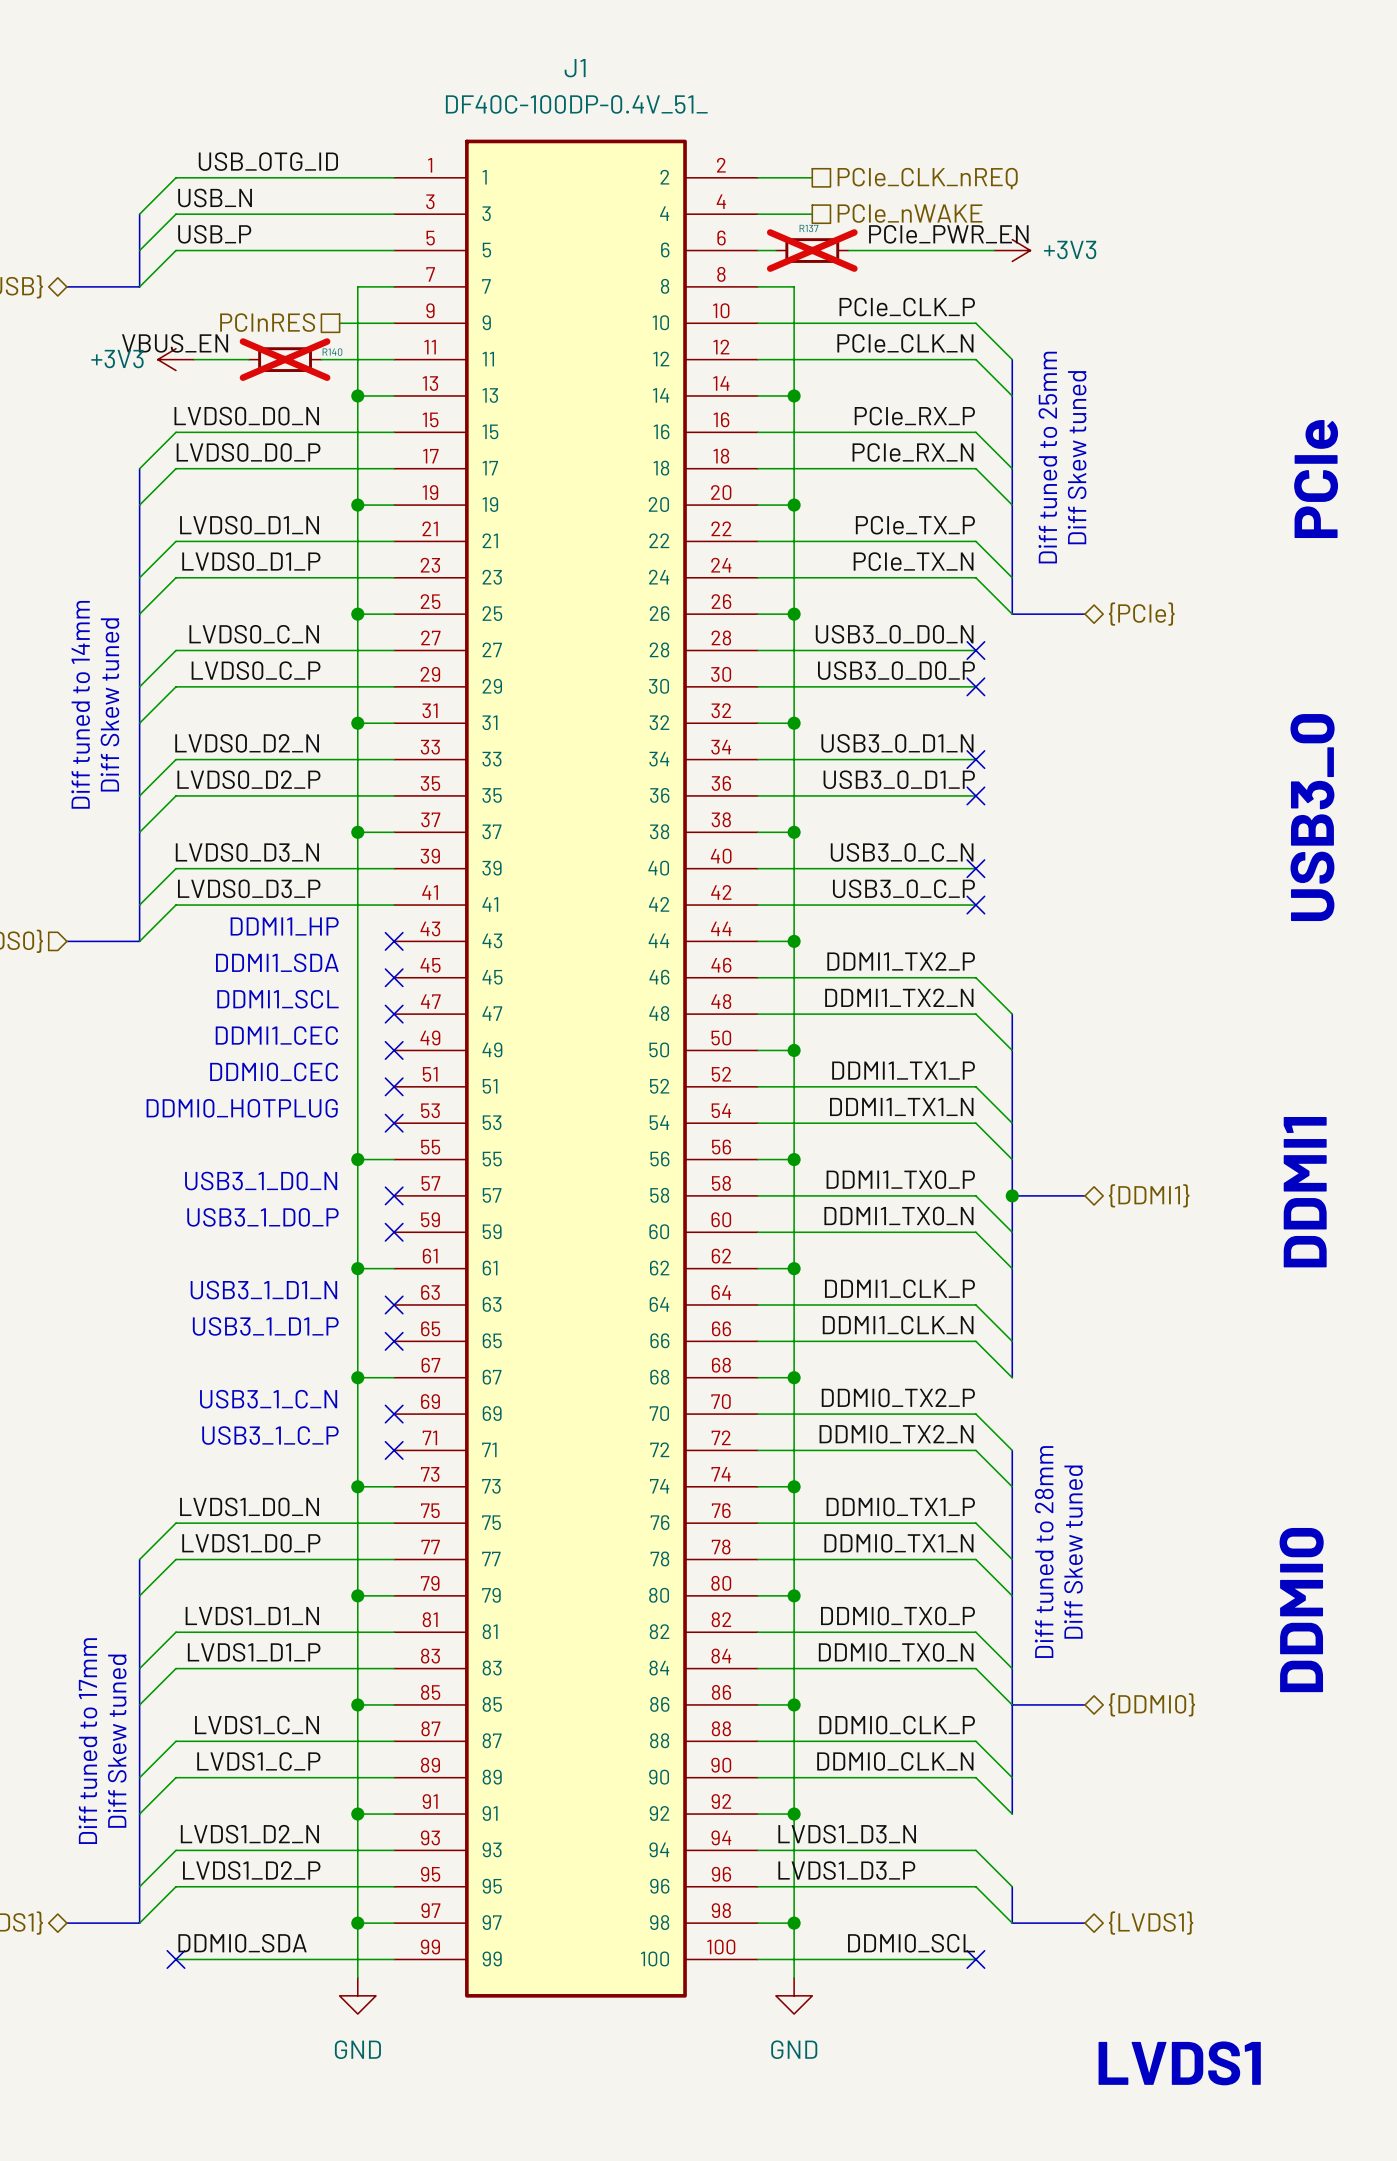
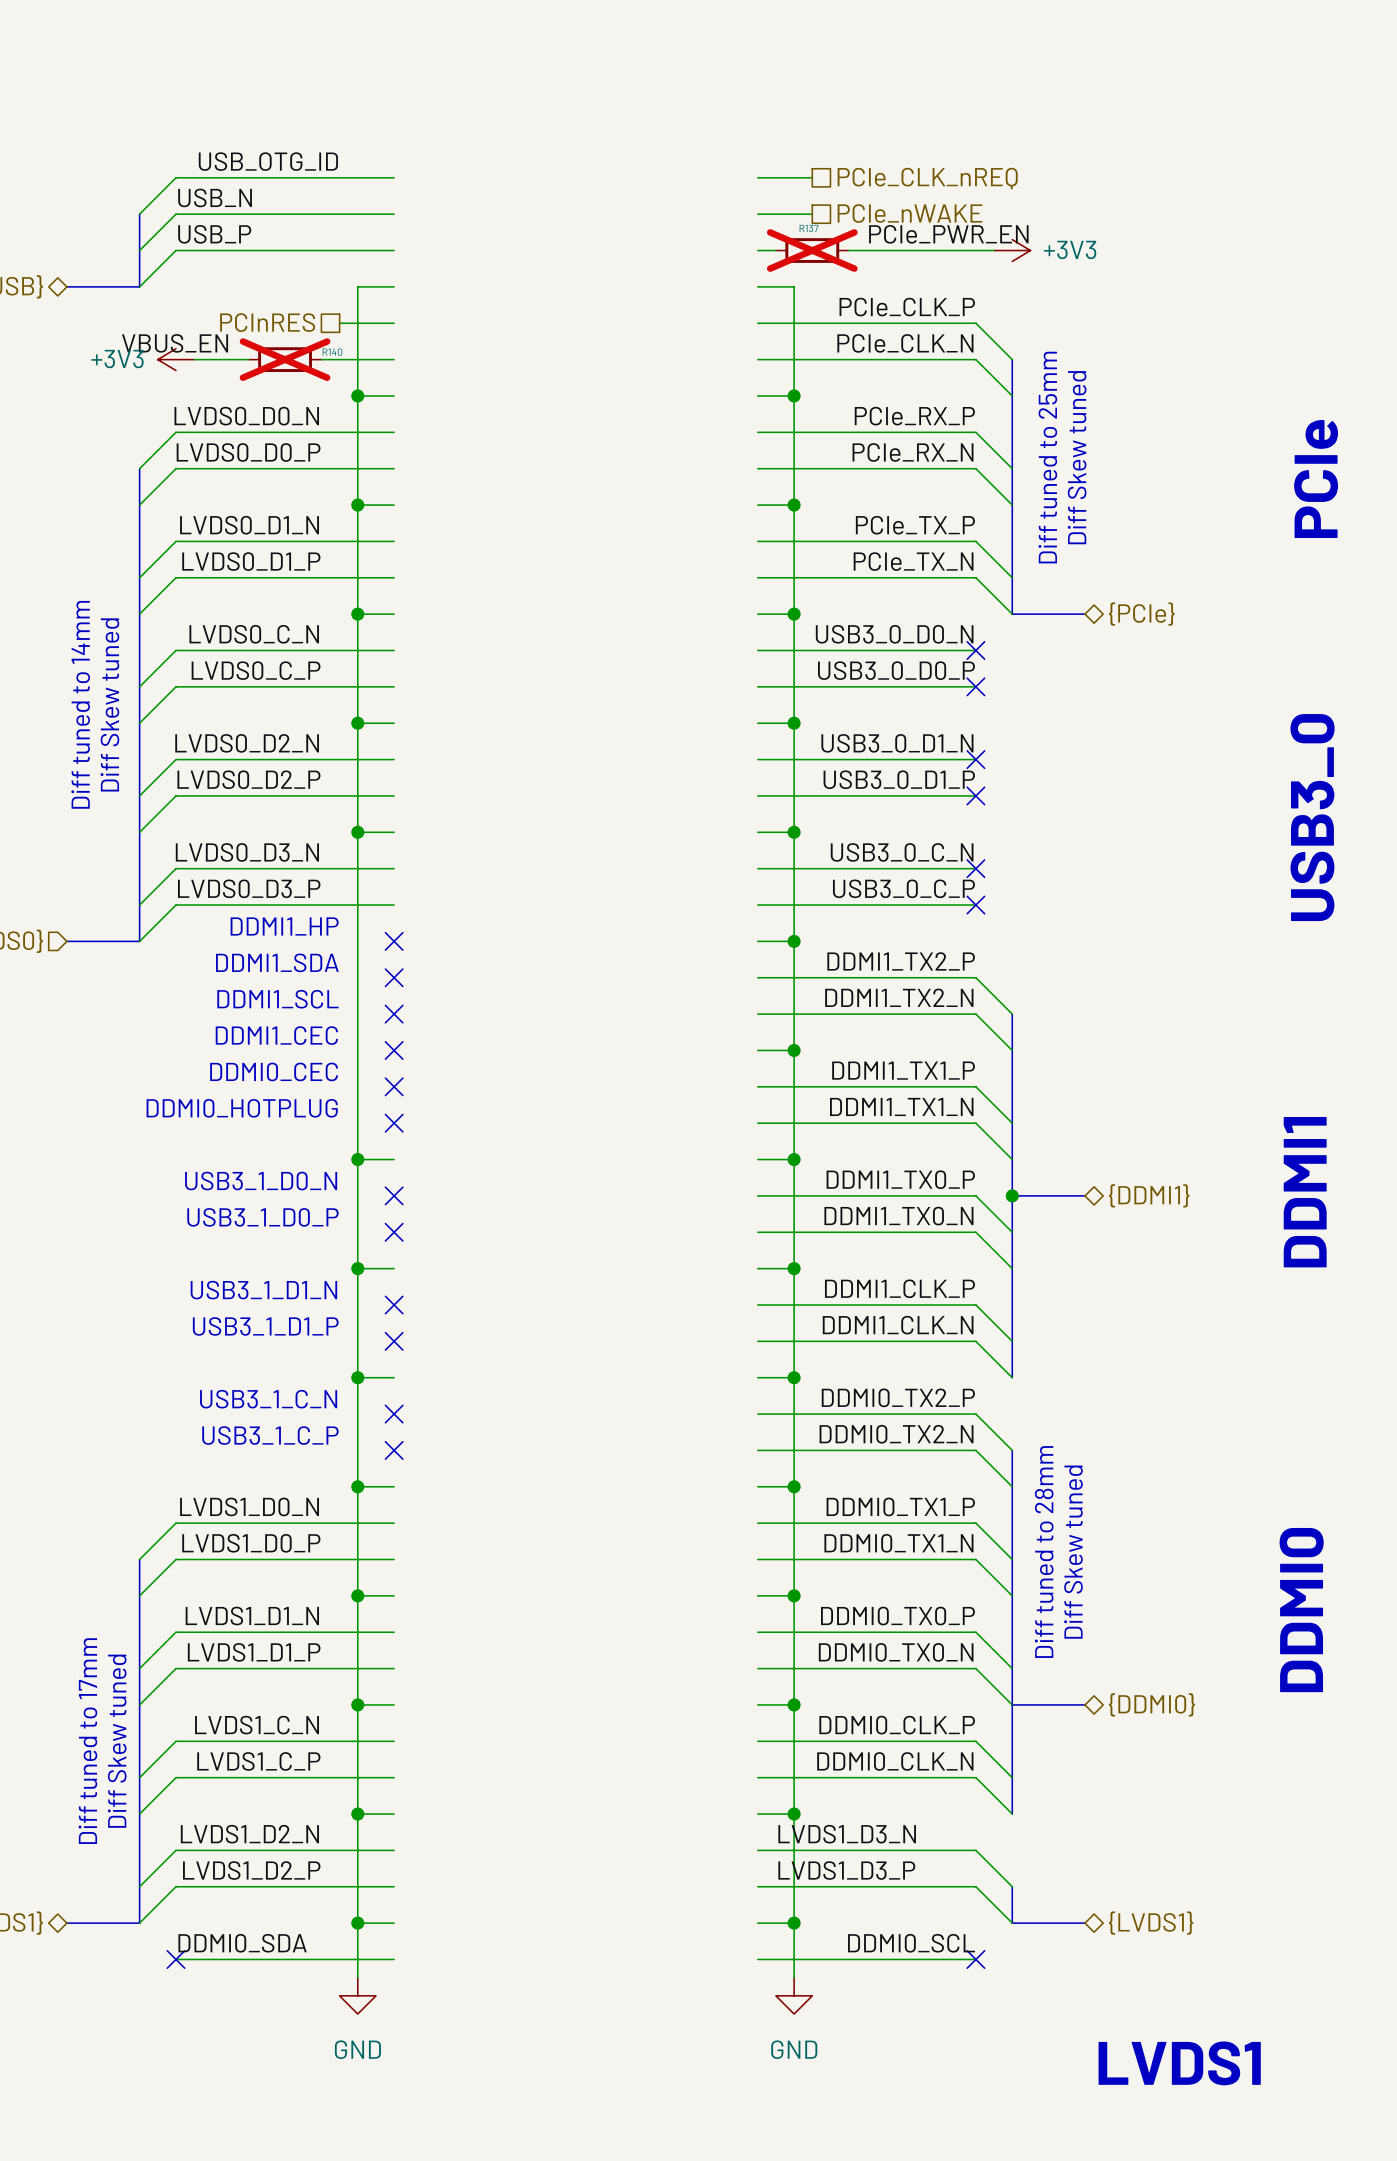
J1: DF40C-100DP-0.4V_51_ (575, 1068) -> none

